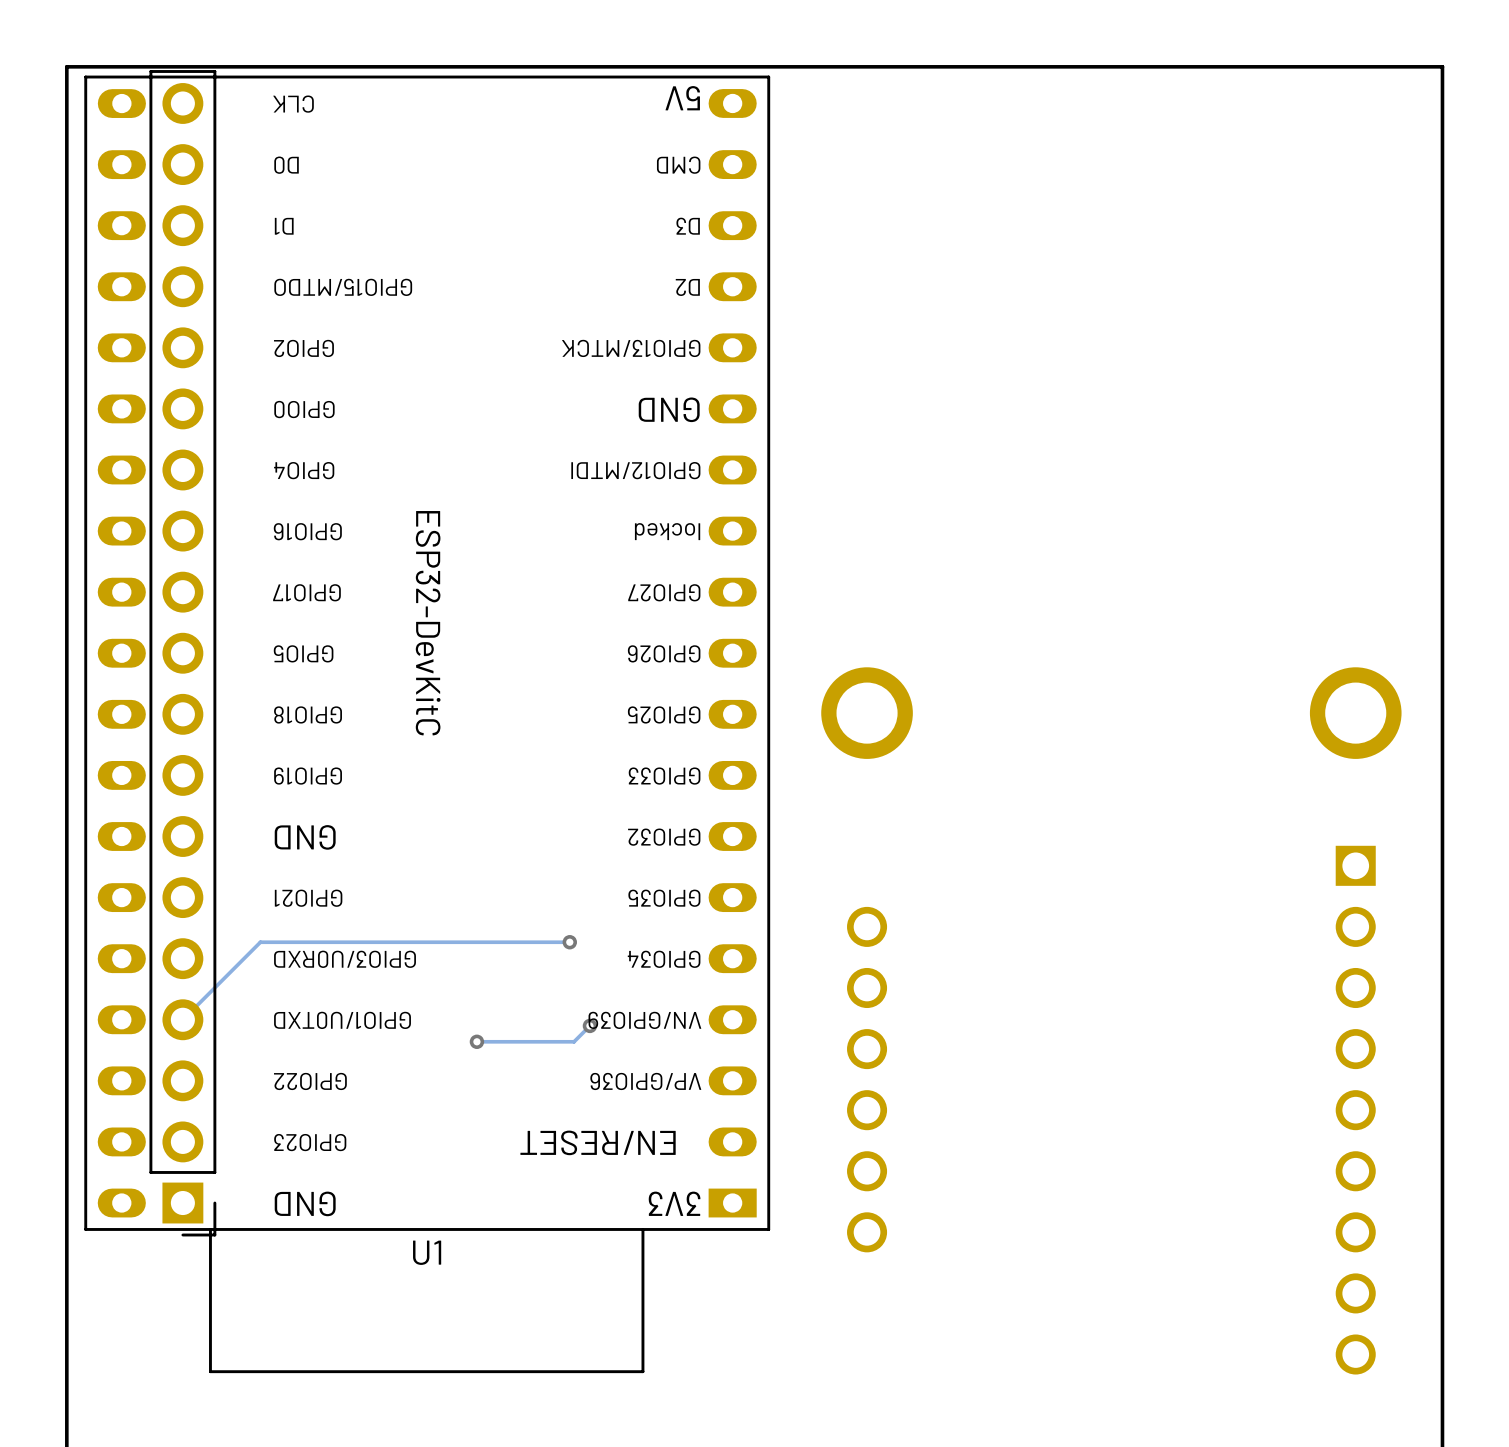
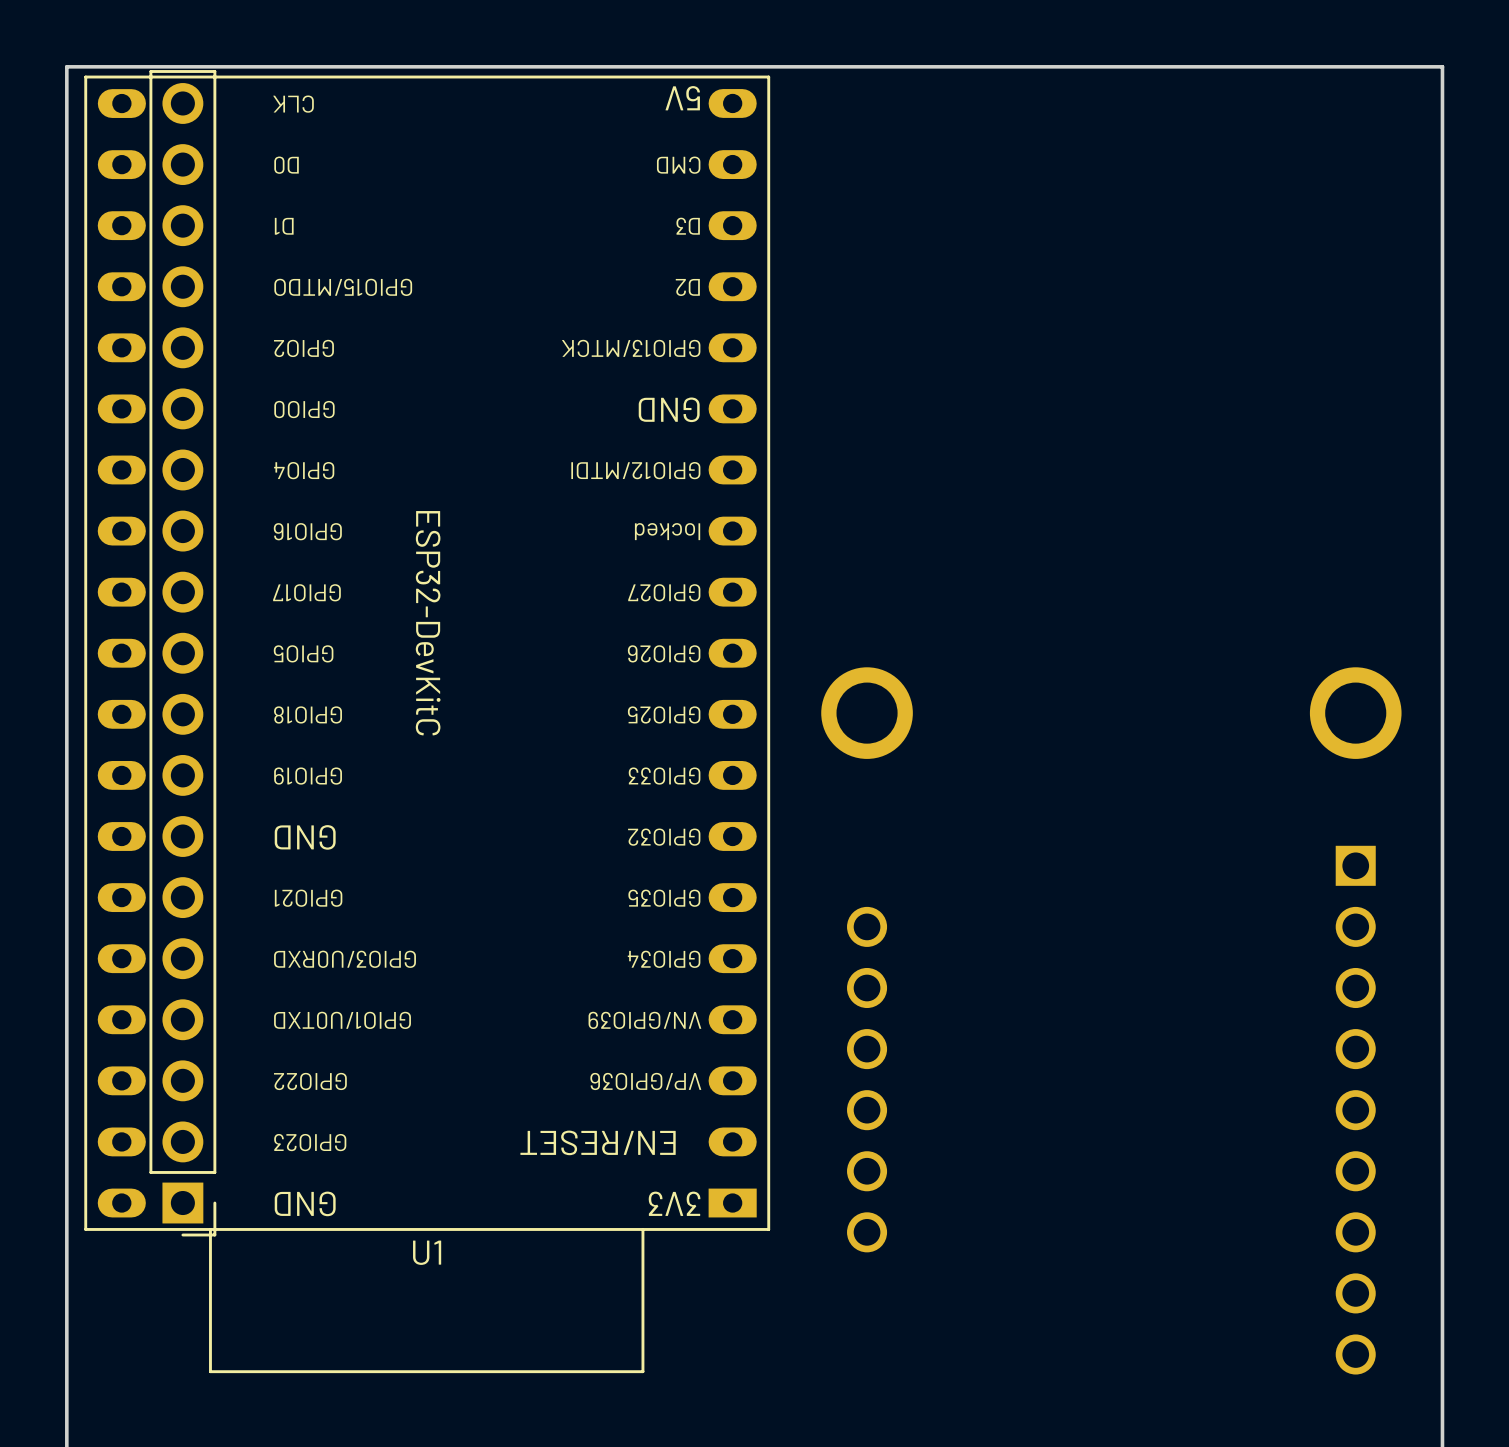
track: (569, 942) (260, 942) (182, 1019) -> none
via: (569, 942) -> none
track: (589, 1025) (574, 1041) (476, 1041) -> none
via: (589, 1025) -> none
via: (476, 1041) -> none

